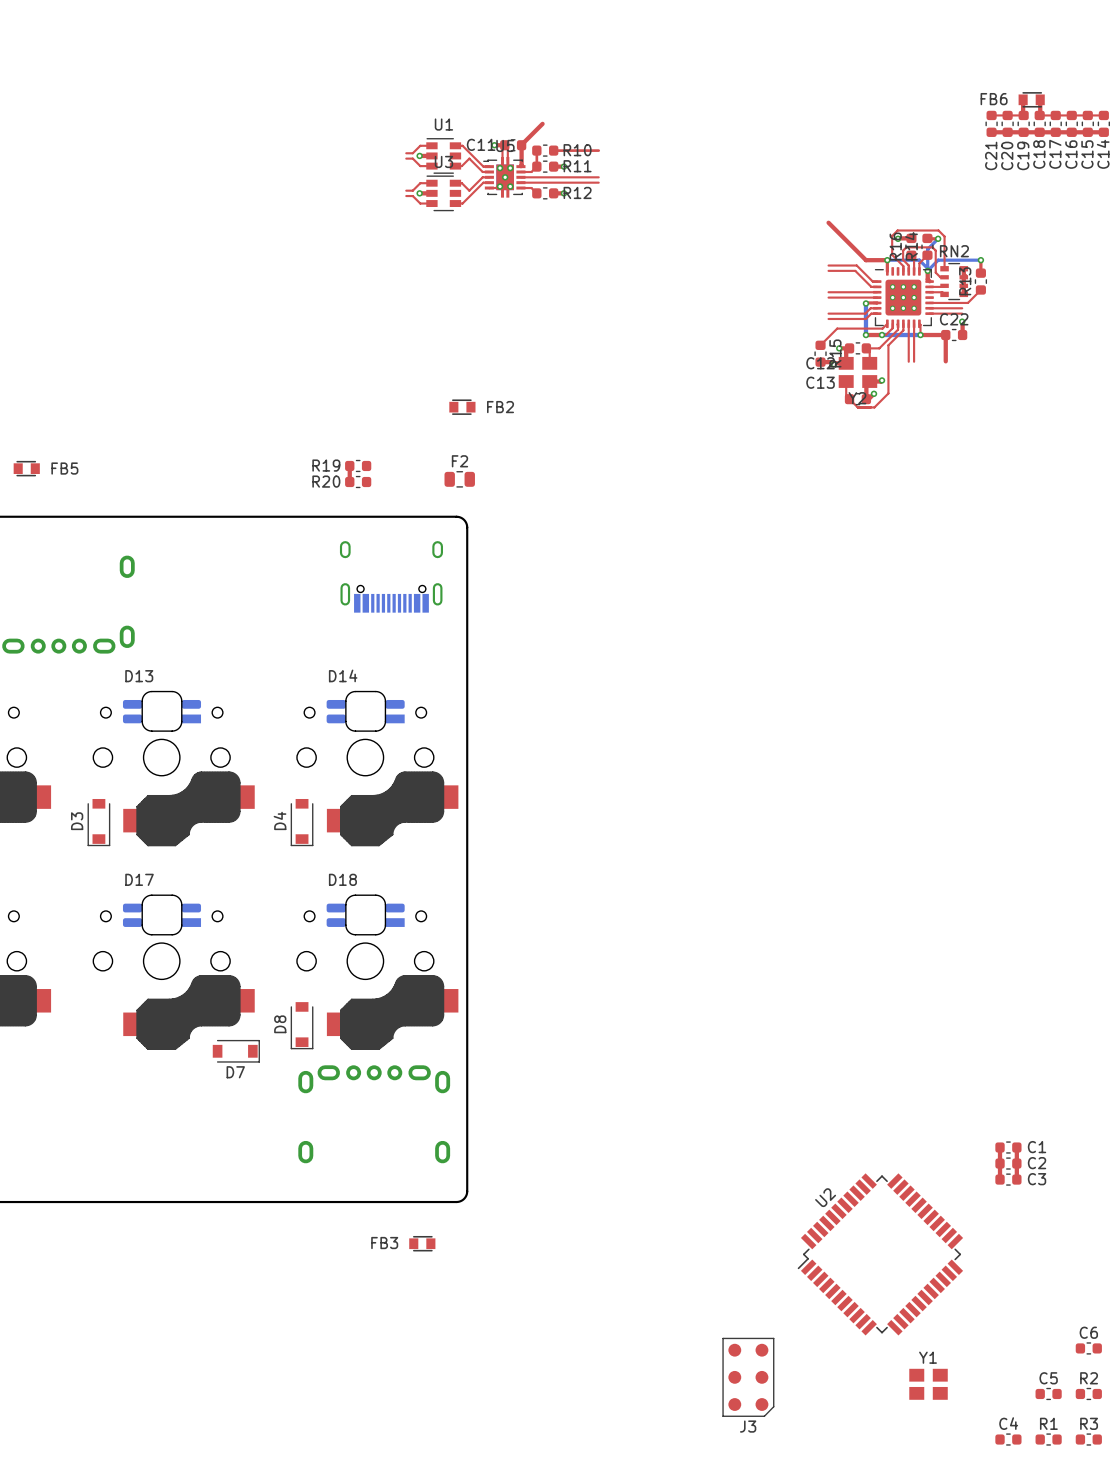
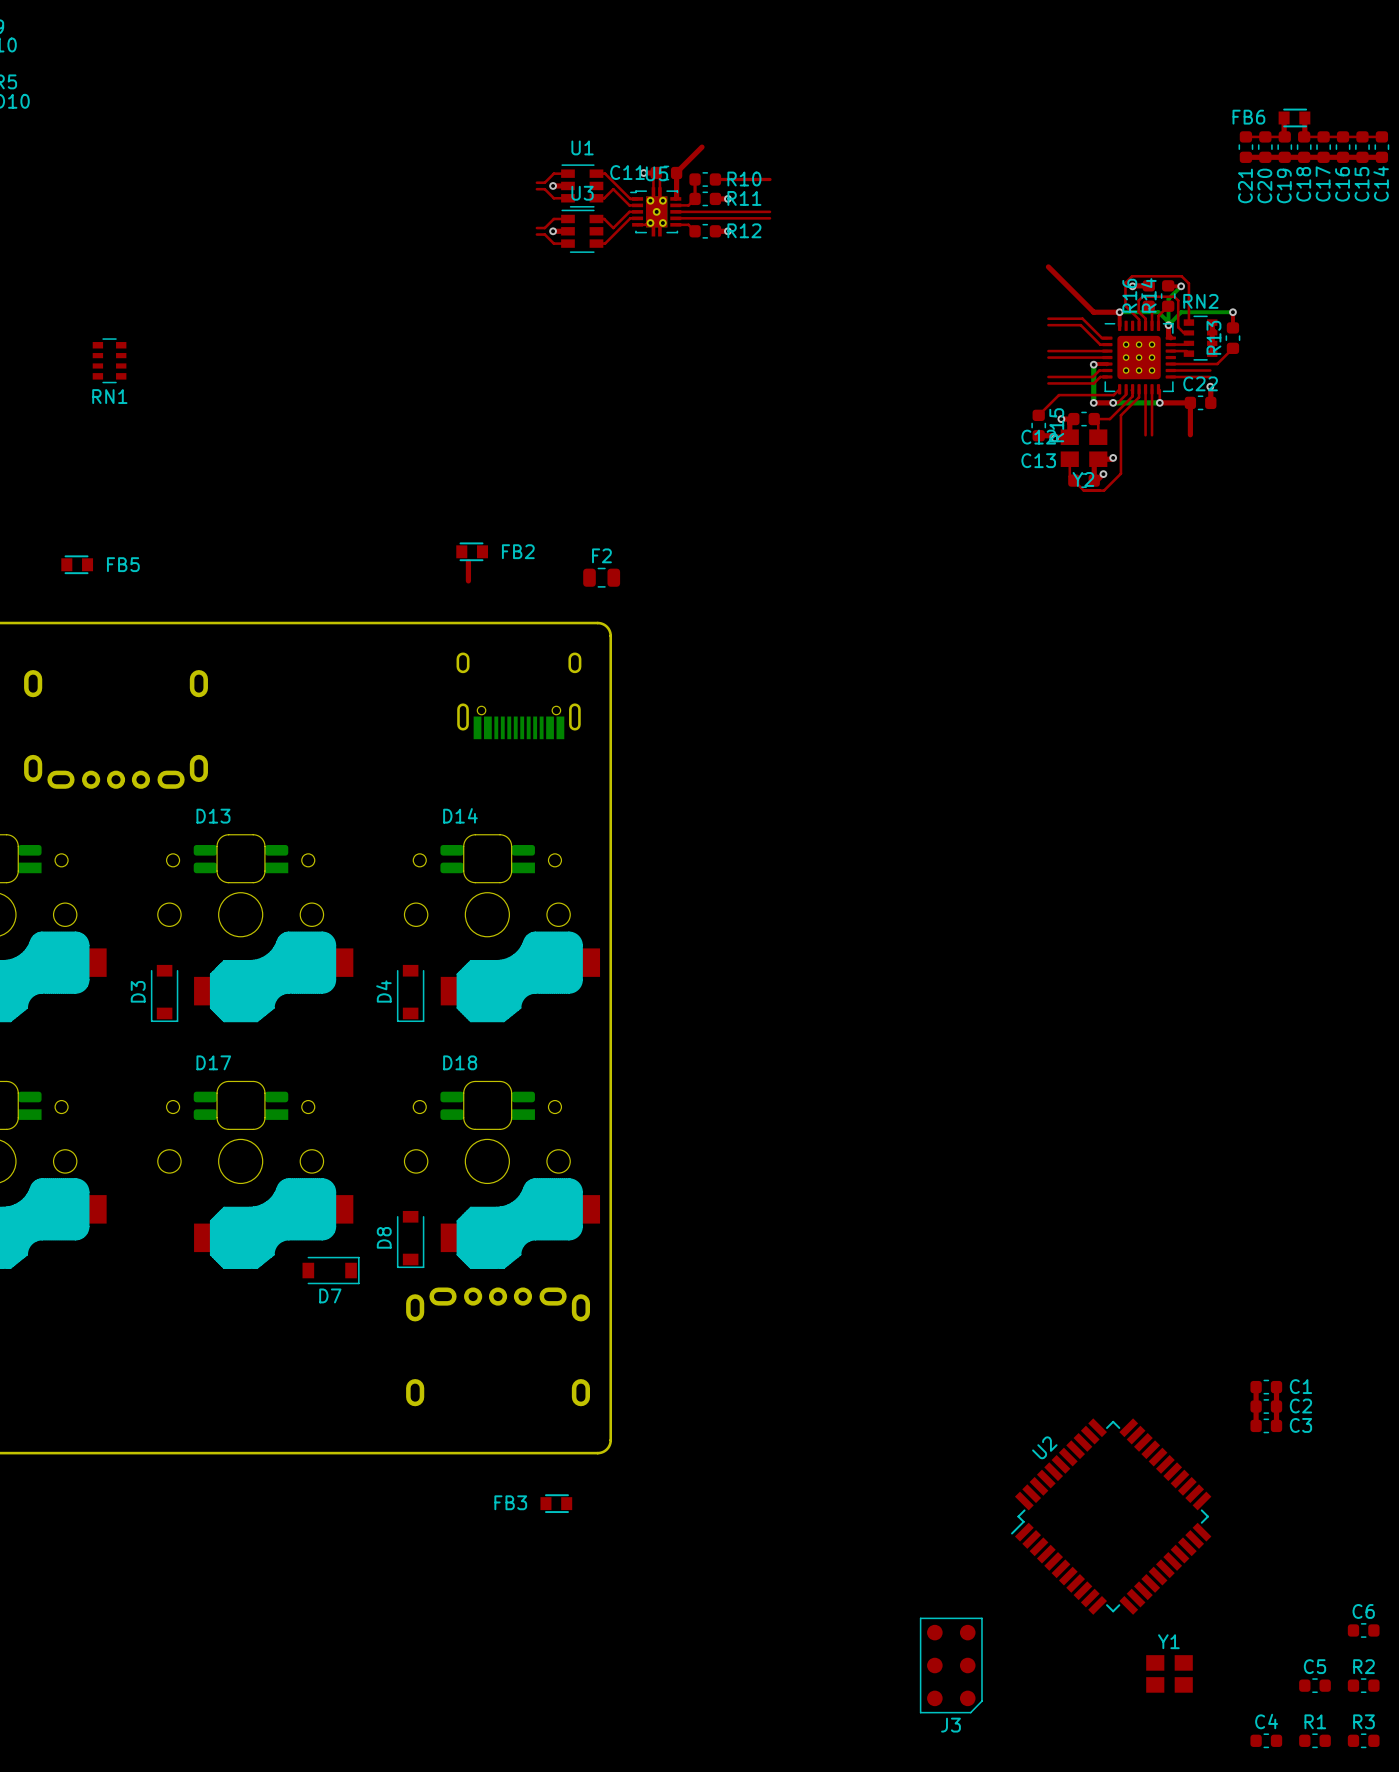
RN1: none -> (109, 360)
FB2 position: (462, 407) -> (472, 551)
R19: (358, 465) -> none
R20: (358, 482) -> none

